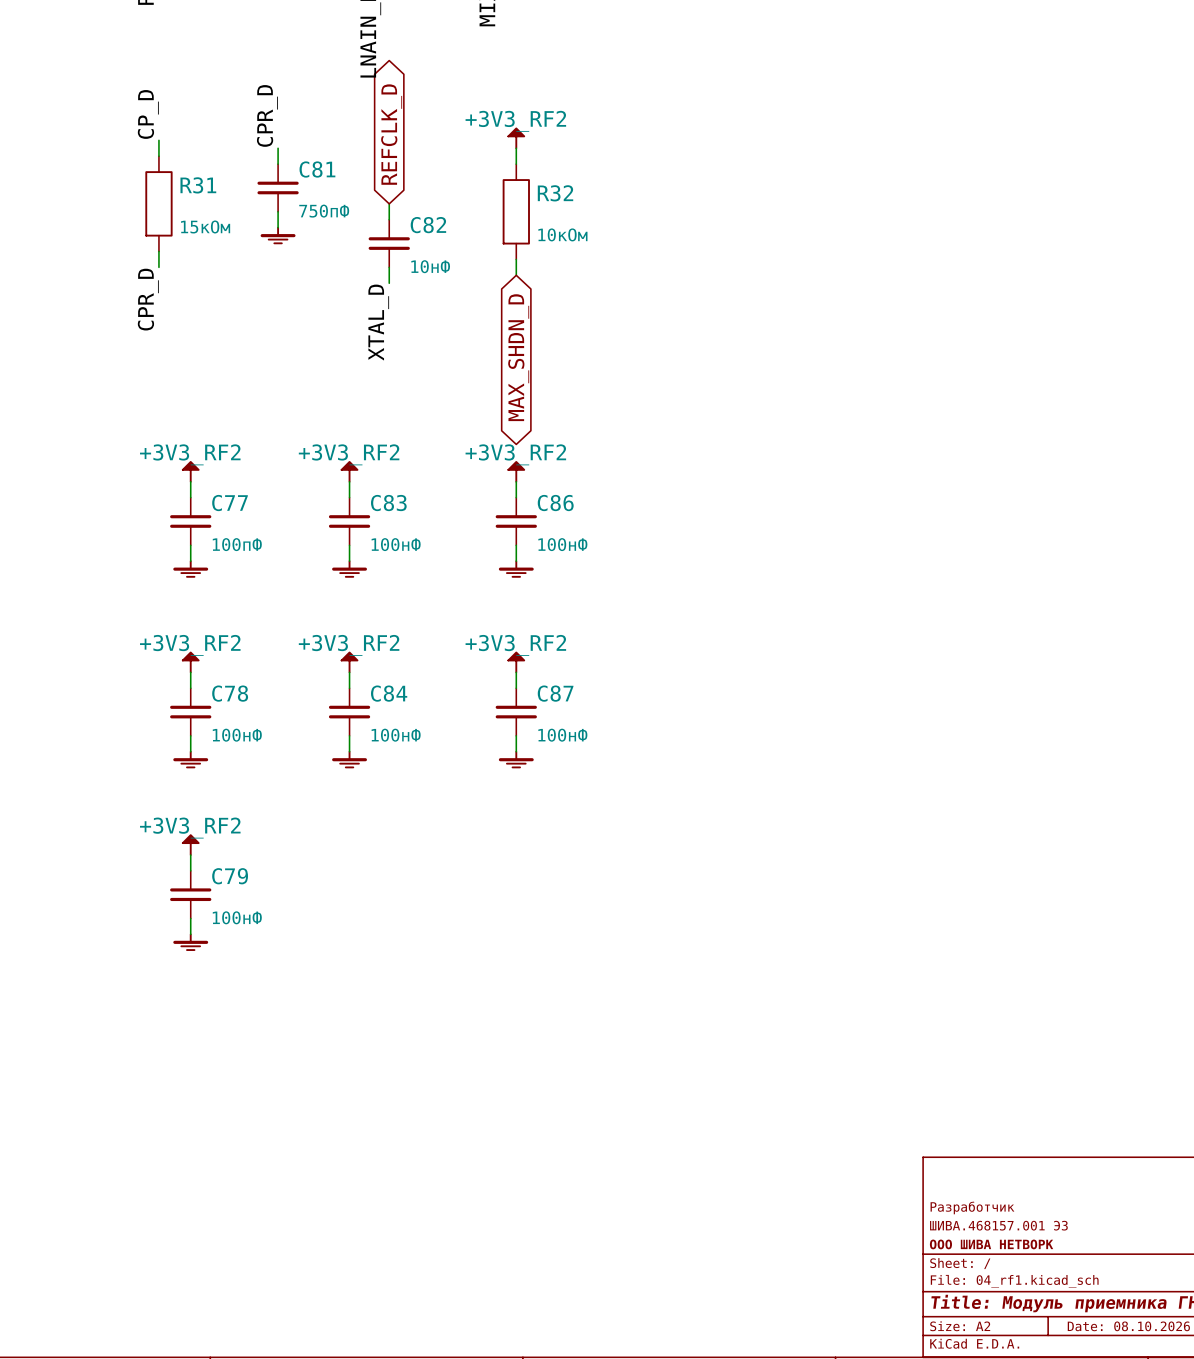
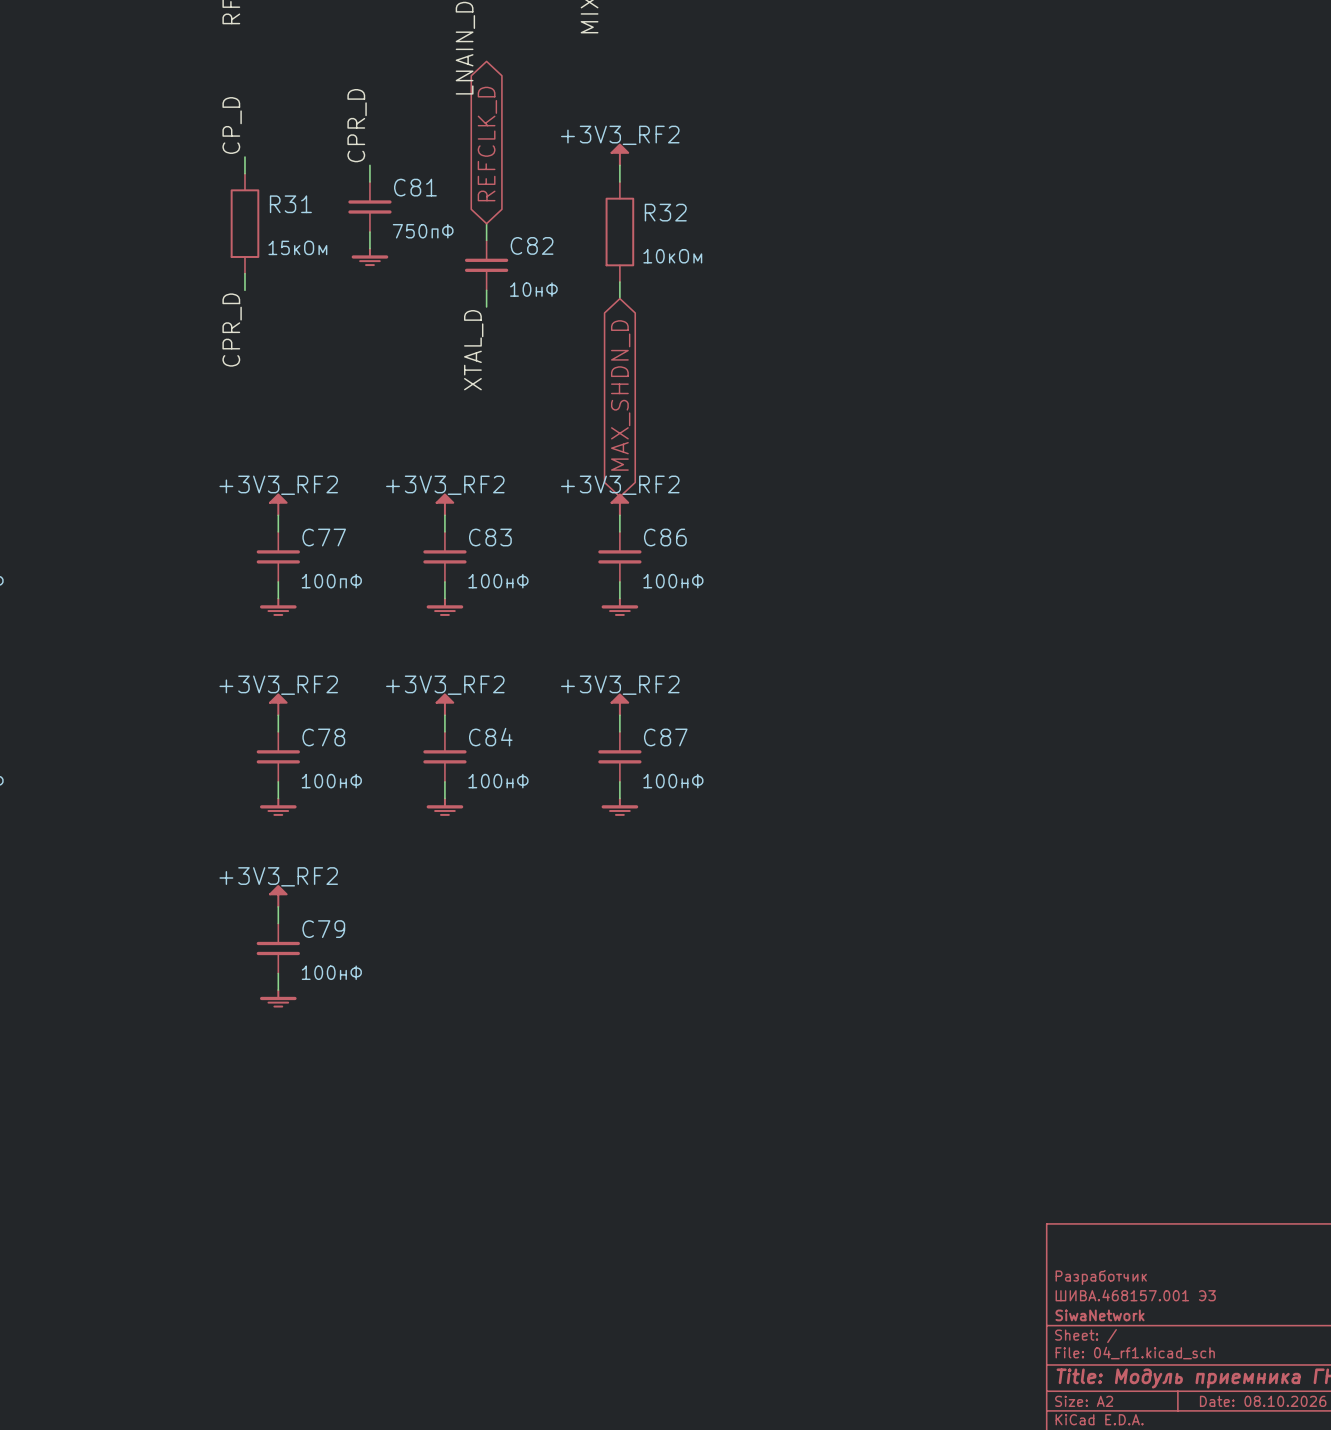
title block: ООО ШИВА НЕТВОРК (991, 1244) -> SiwaNetwork (1100, 1315)

